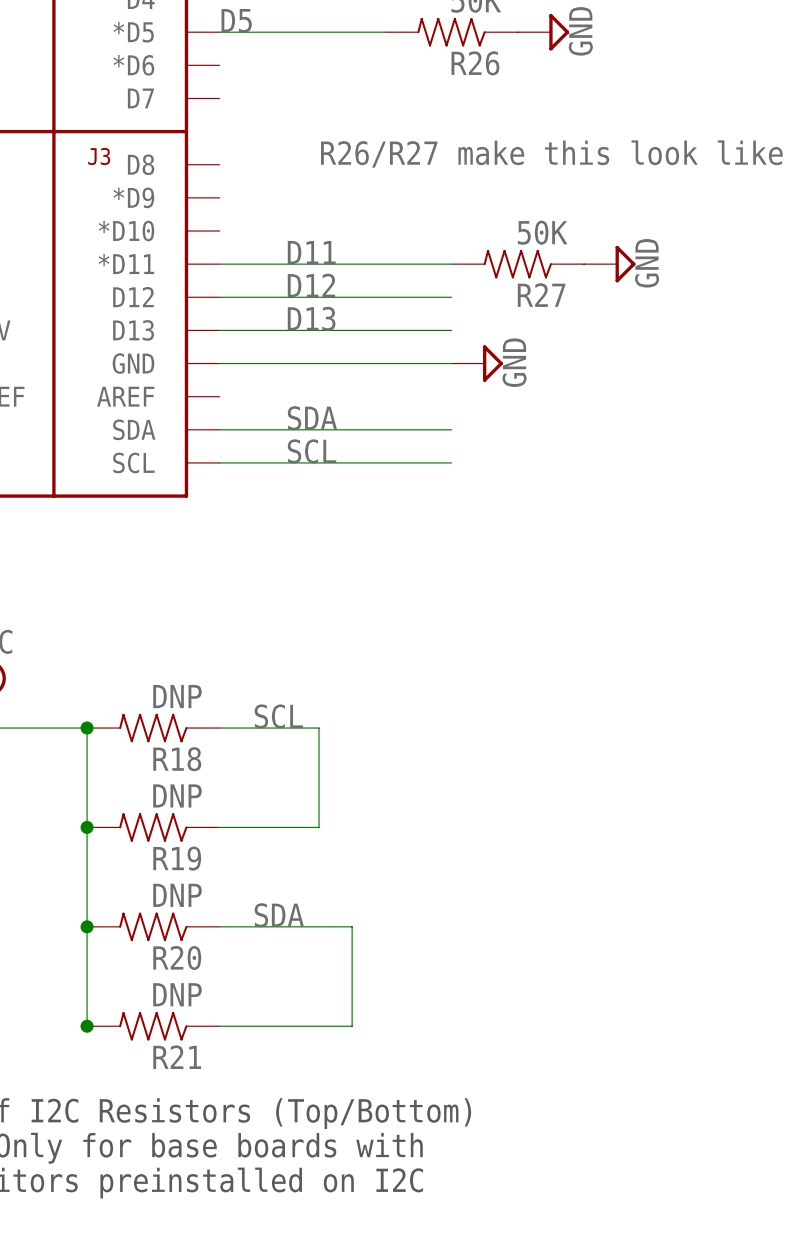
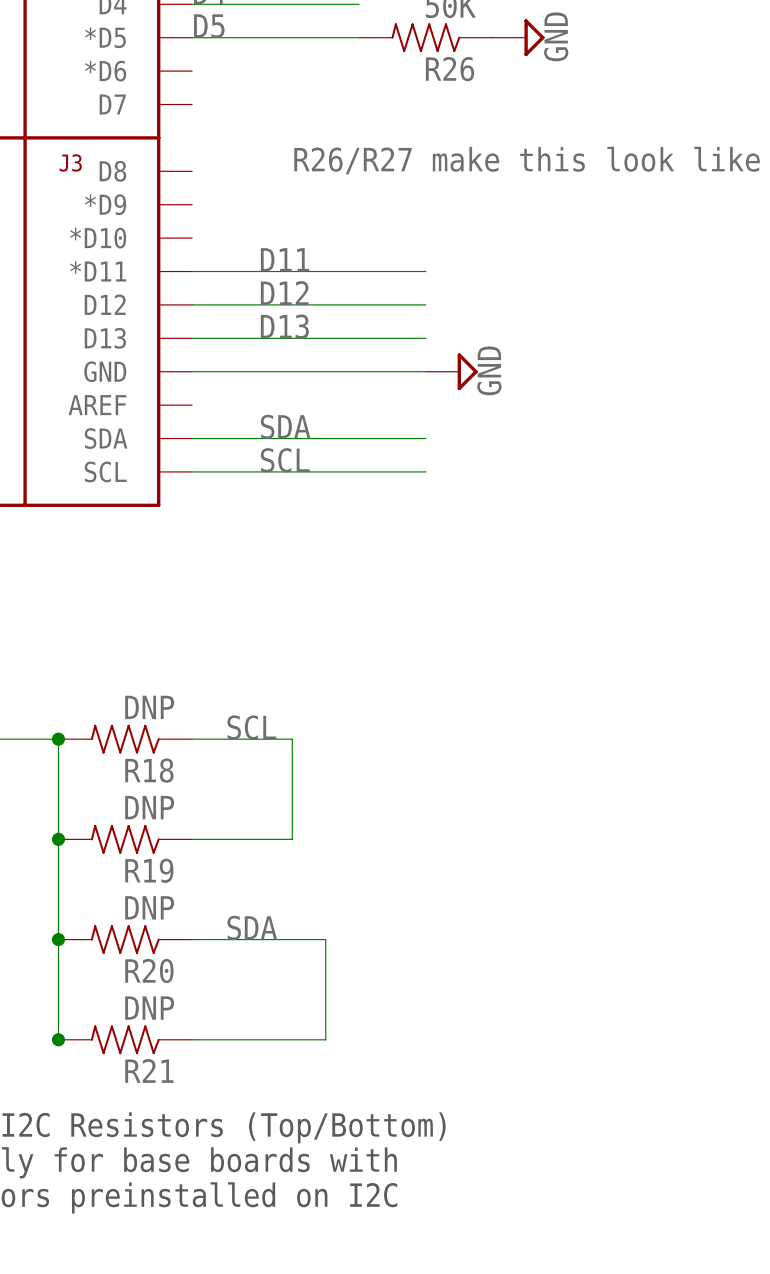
R27: 50K (517, 264) -> none
power symbol: GND (609, 264) -> none

